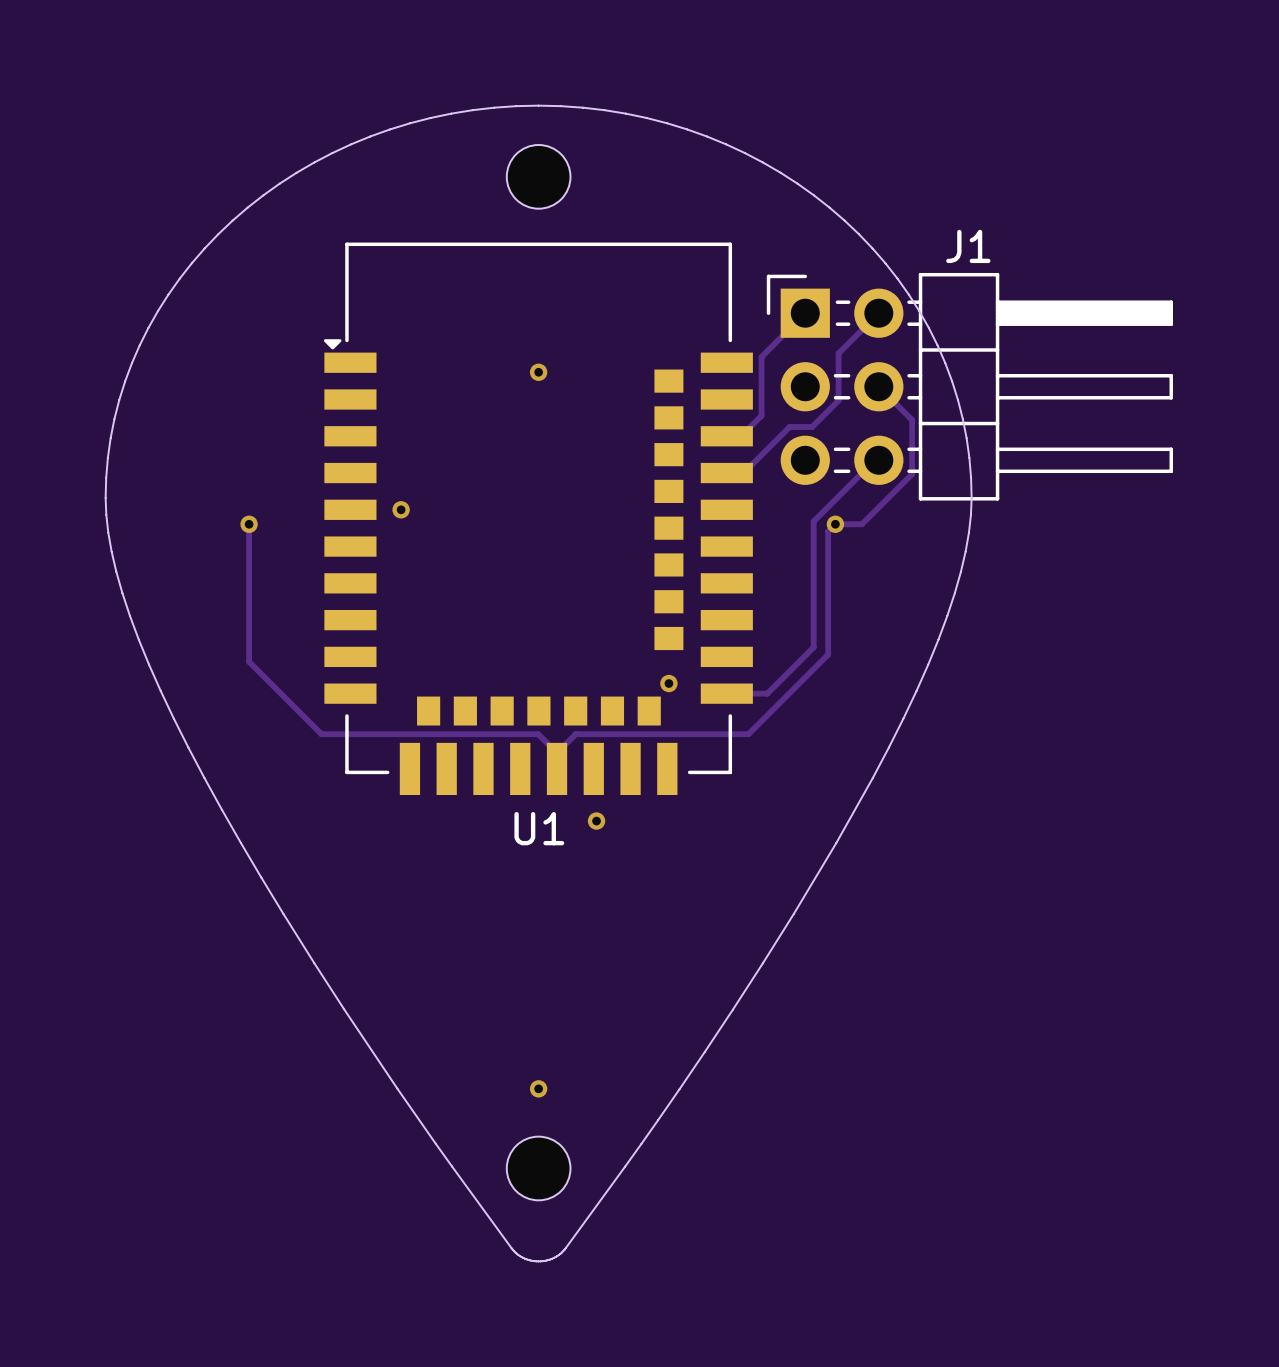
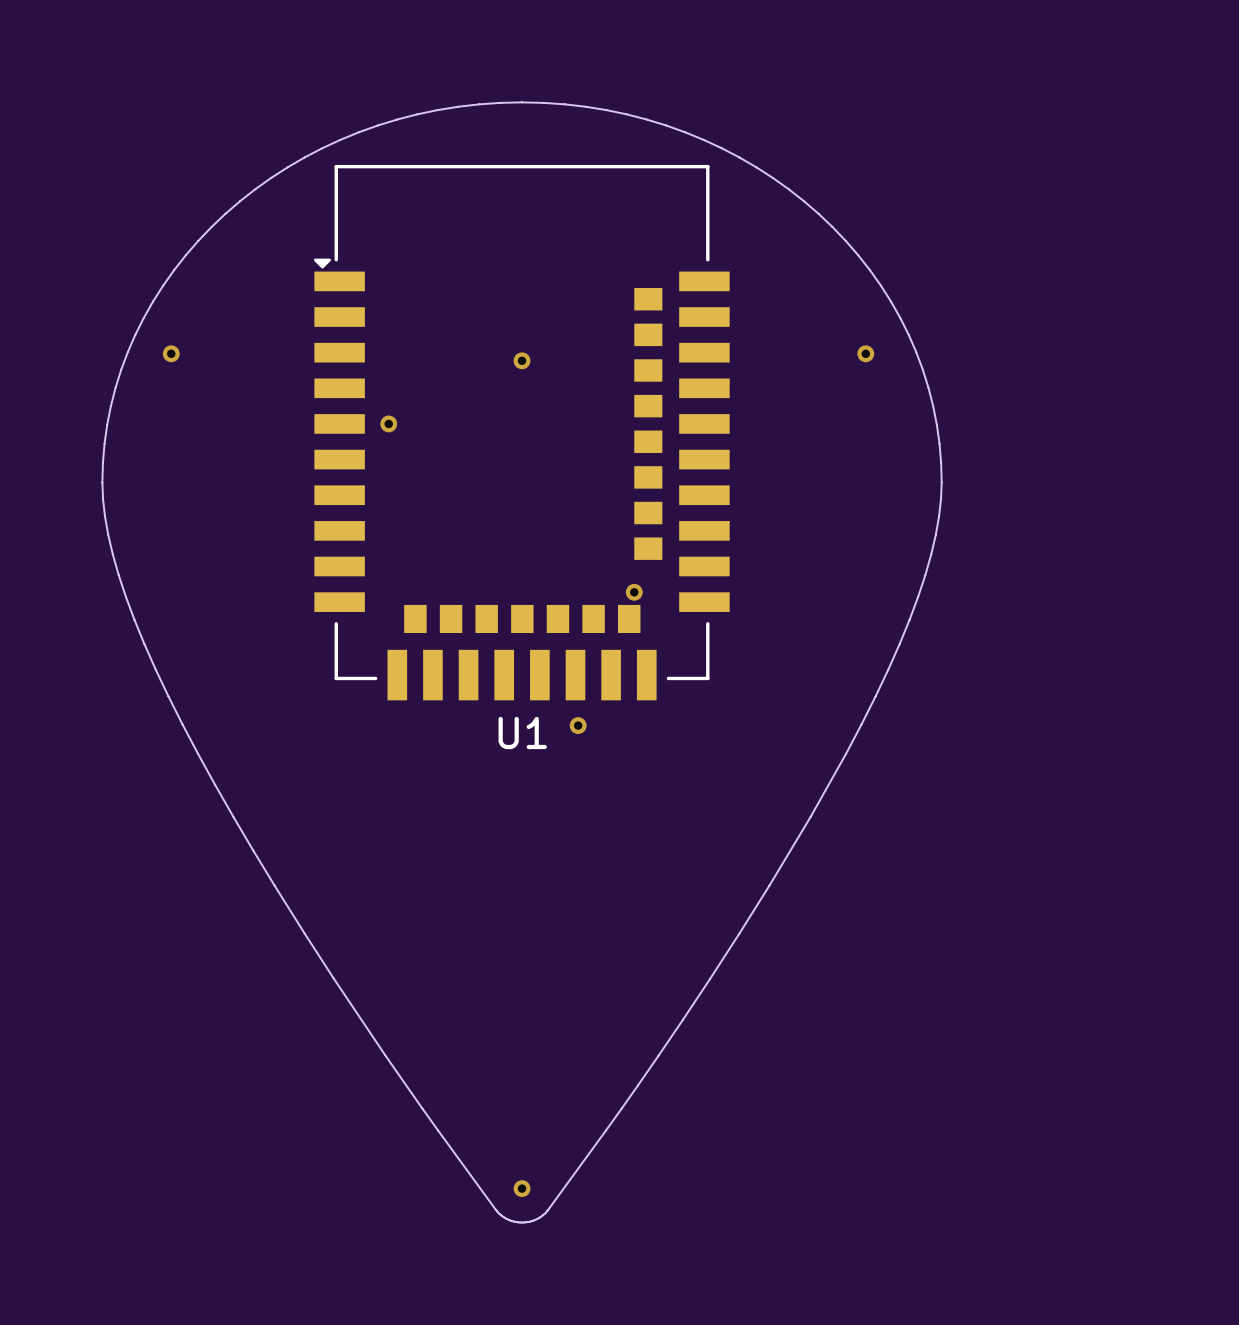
part: (538, 176) -> none
track: (805, 313) (761, 356) (761, 415) (741, 436) (726, 436) -> none
track: (878, 313) (838, 353) (838, 400) (812, 427) (789, 427) (743, 473) (726, 473) -> none
via: none -> (171, 353)
via: none -> (865, 353)
track: (878, 386) (912, 420) (912, 474) (861, 524) (835, 524) (828, 531) (828, 654) (748, 734) (575, 734) (557, 753) -> none
J1: (969, 386) -> none
track: (878, 460) (874, 460) (813, 521) (813, 647) (767, 693) (726, 693) -> none
via position: (401, 509) -> (388, 423)
U1 position: (538, 518) -> (521, 432)
track: (249, 524) (249, 661) (321, 734) (538, 734) (557, 753) -> none
via: (249, 524) -> none
via: (835, 524) -> none
via: none -> (634, 592)
via: (668, 683) -> none
via: none -> (578, 725)
via: (596, 821) -> none
via position: (538, 1088) -> (522, 1188)
part: (538, 1168) -> none

